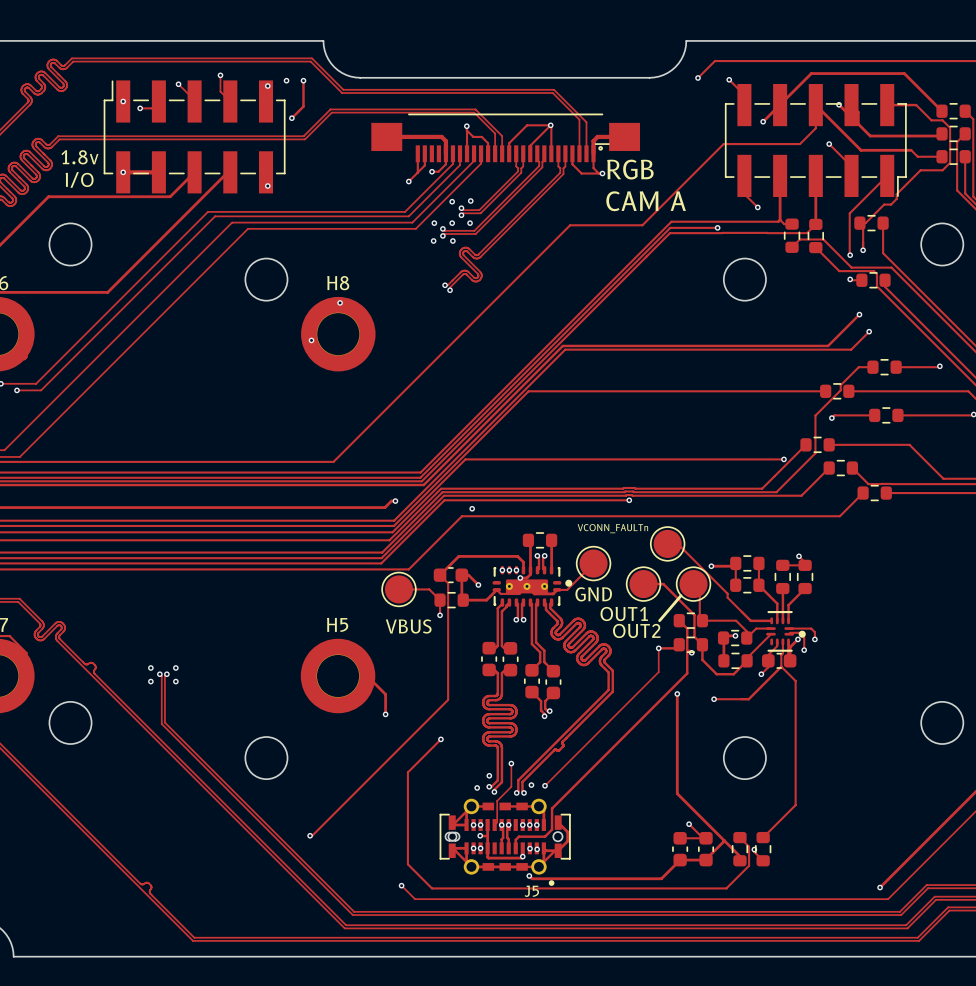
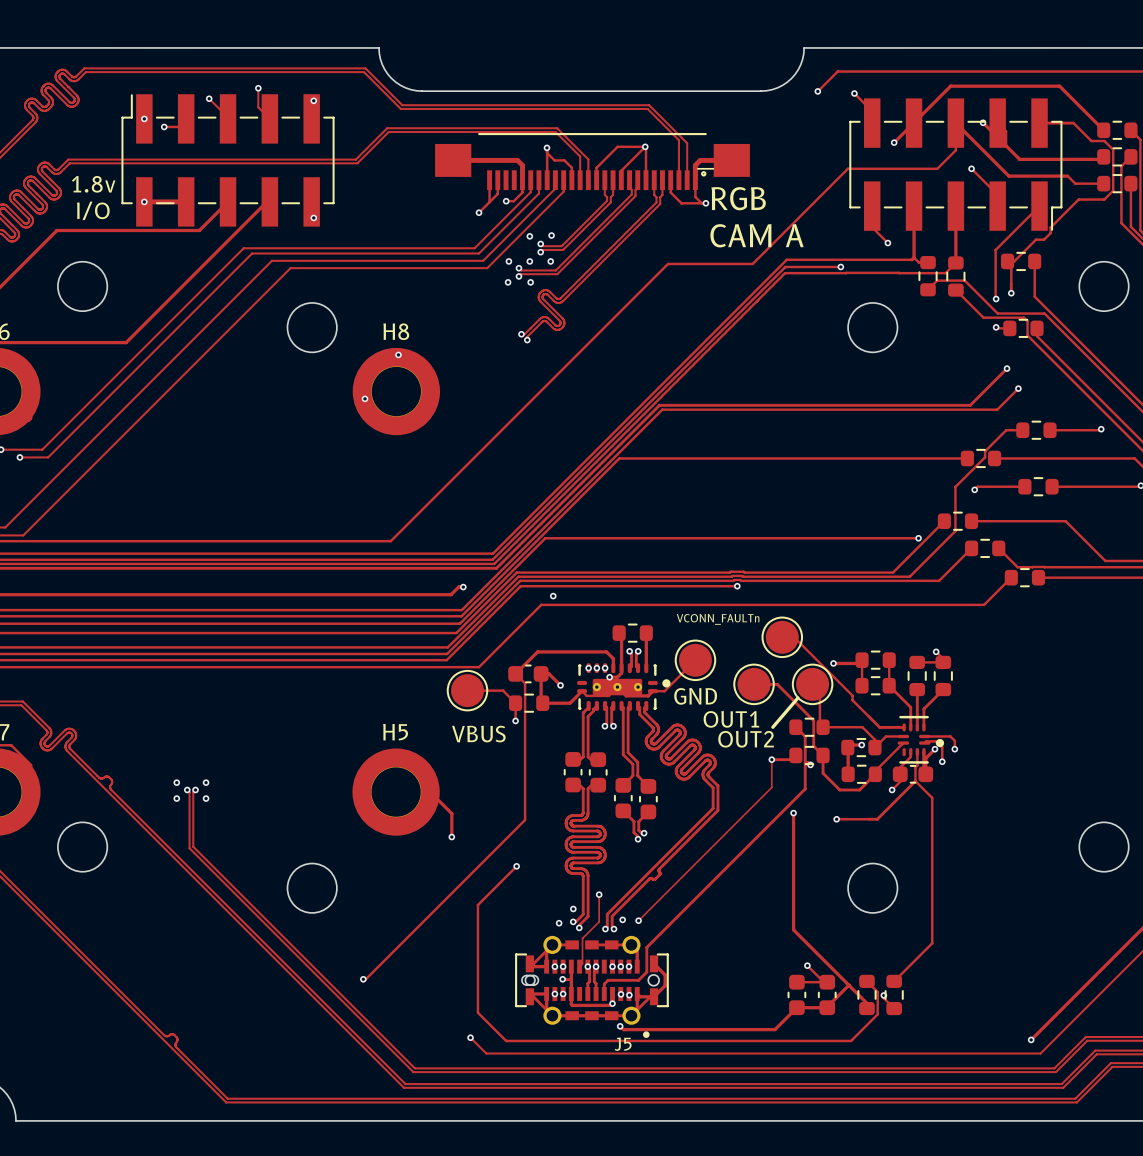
via: (286, 80) -> none
track: (303, 80) (303, 106) (291, 118) -> none
via: (303, 80) -> none
via: (291, 118) -> none

